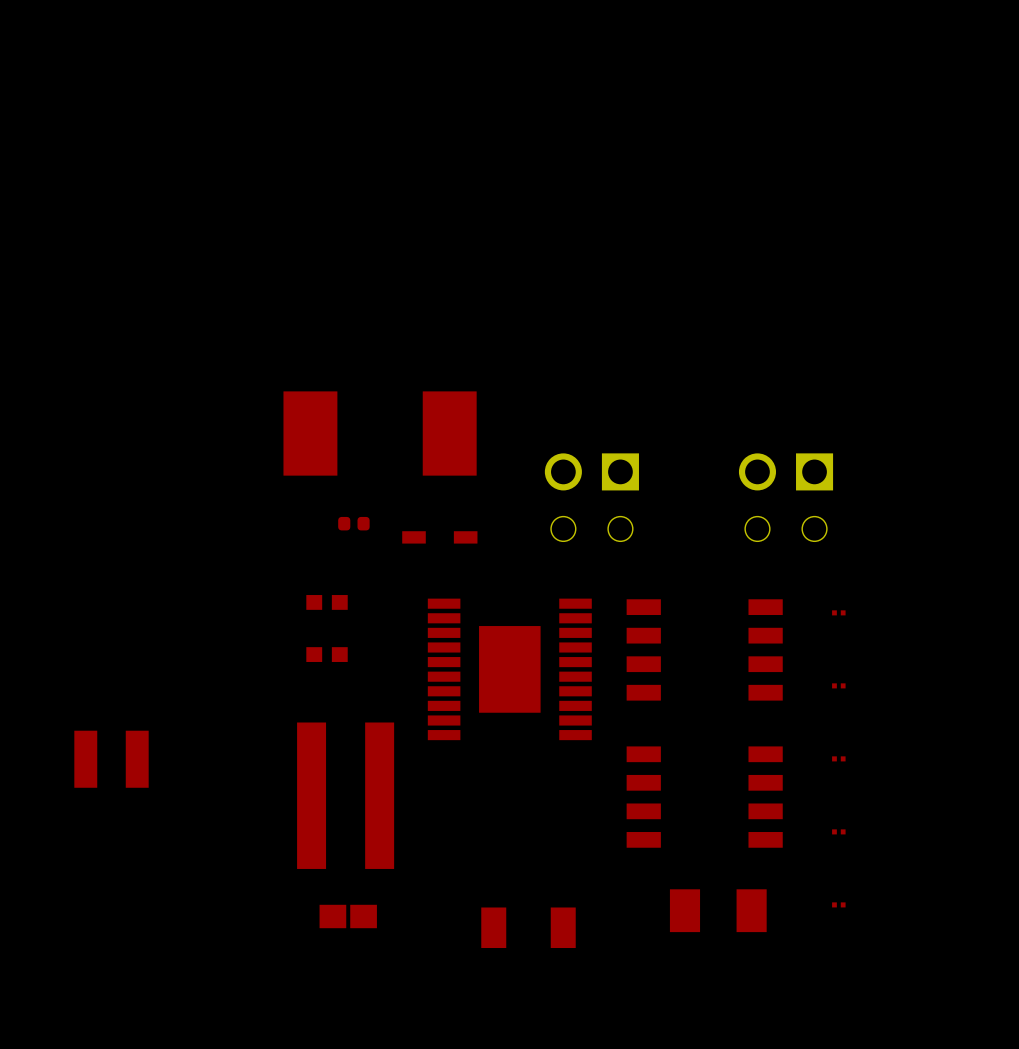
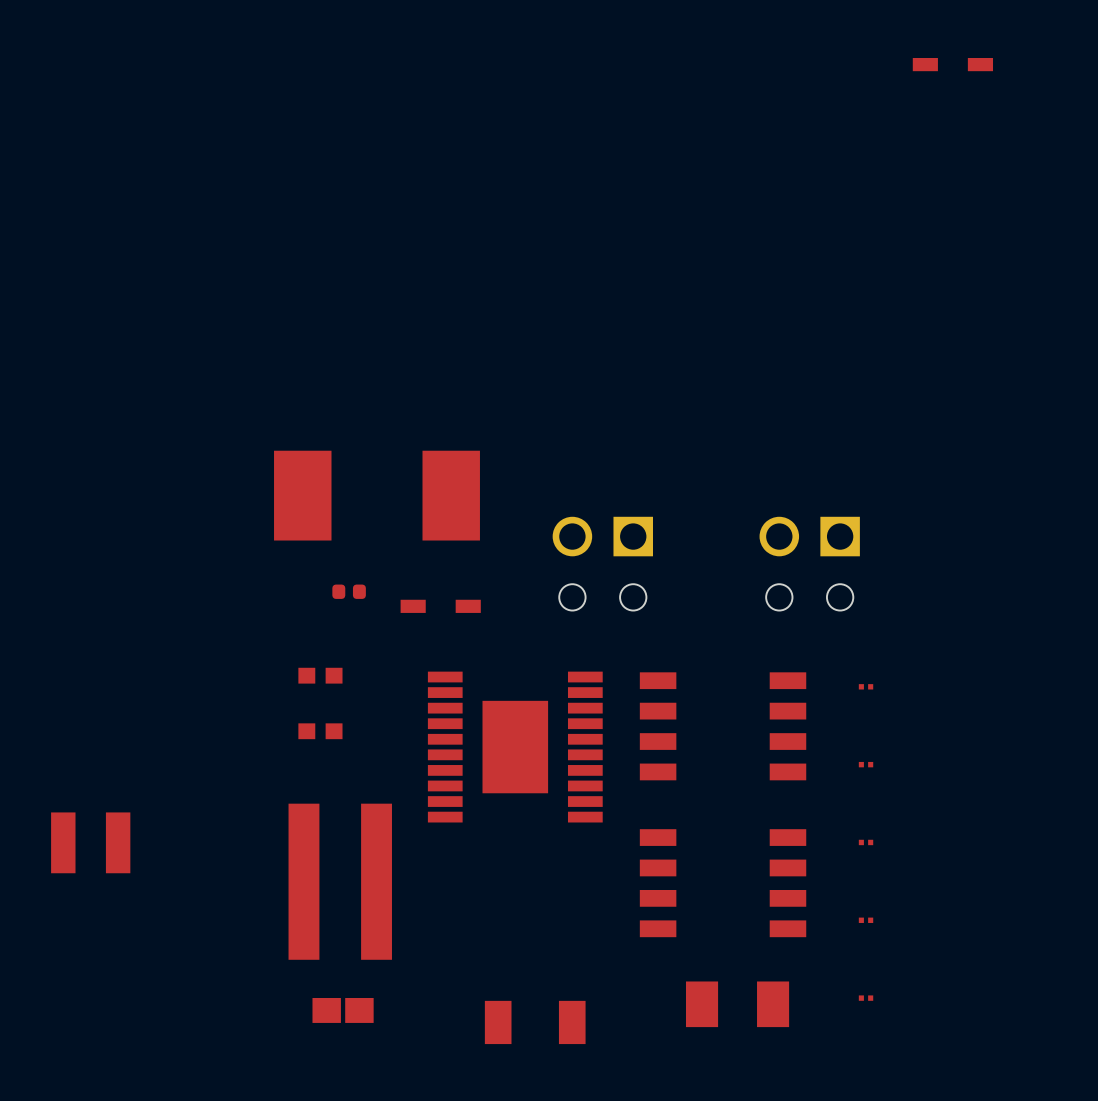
part: none -> (952, 64)

